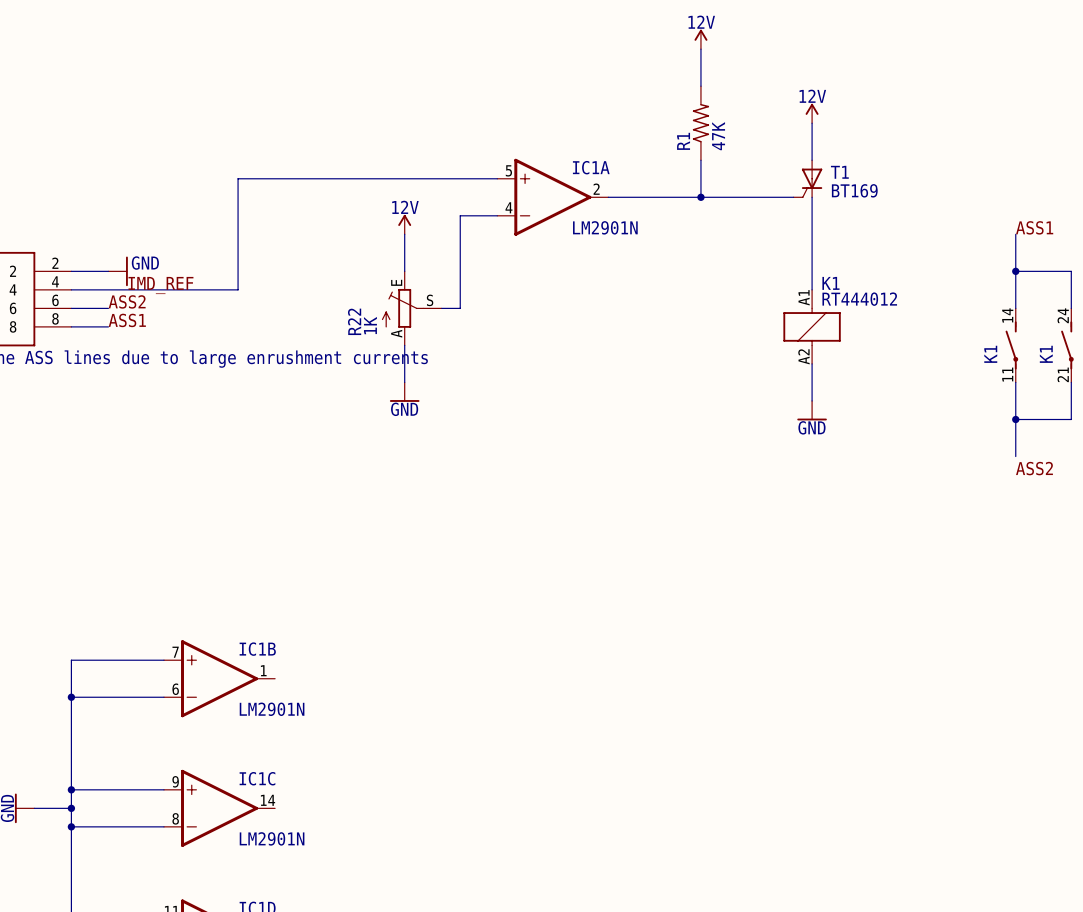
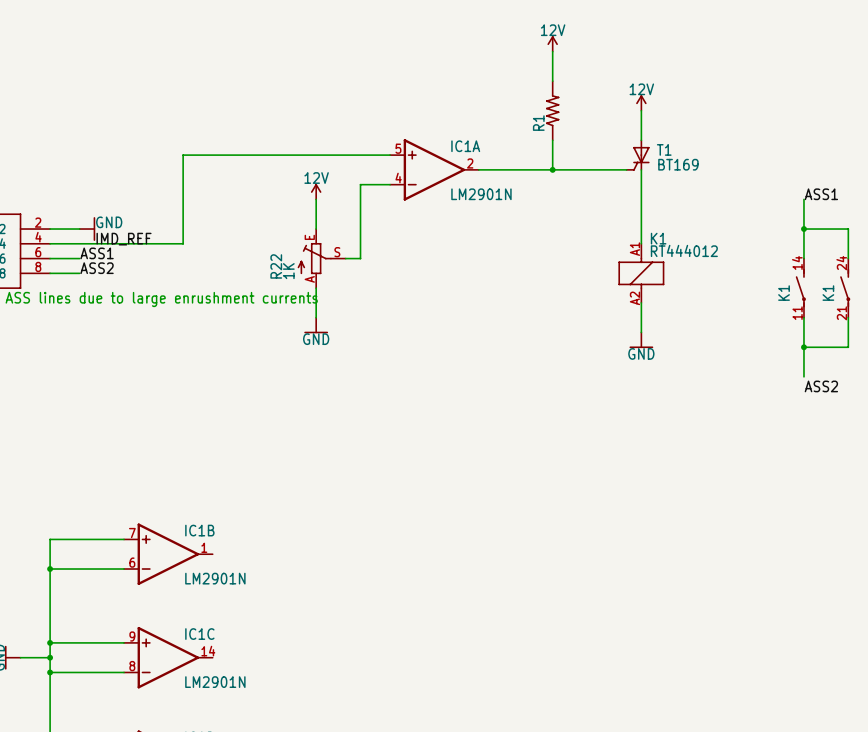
R1 value: 47K (718, 136) -> none
label: ASS2 (127, 301) -> ASS1 (97, 253)
label: ASS1 (127, 320) -> ASS2 (97, 268)

